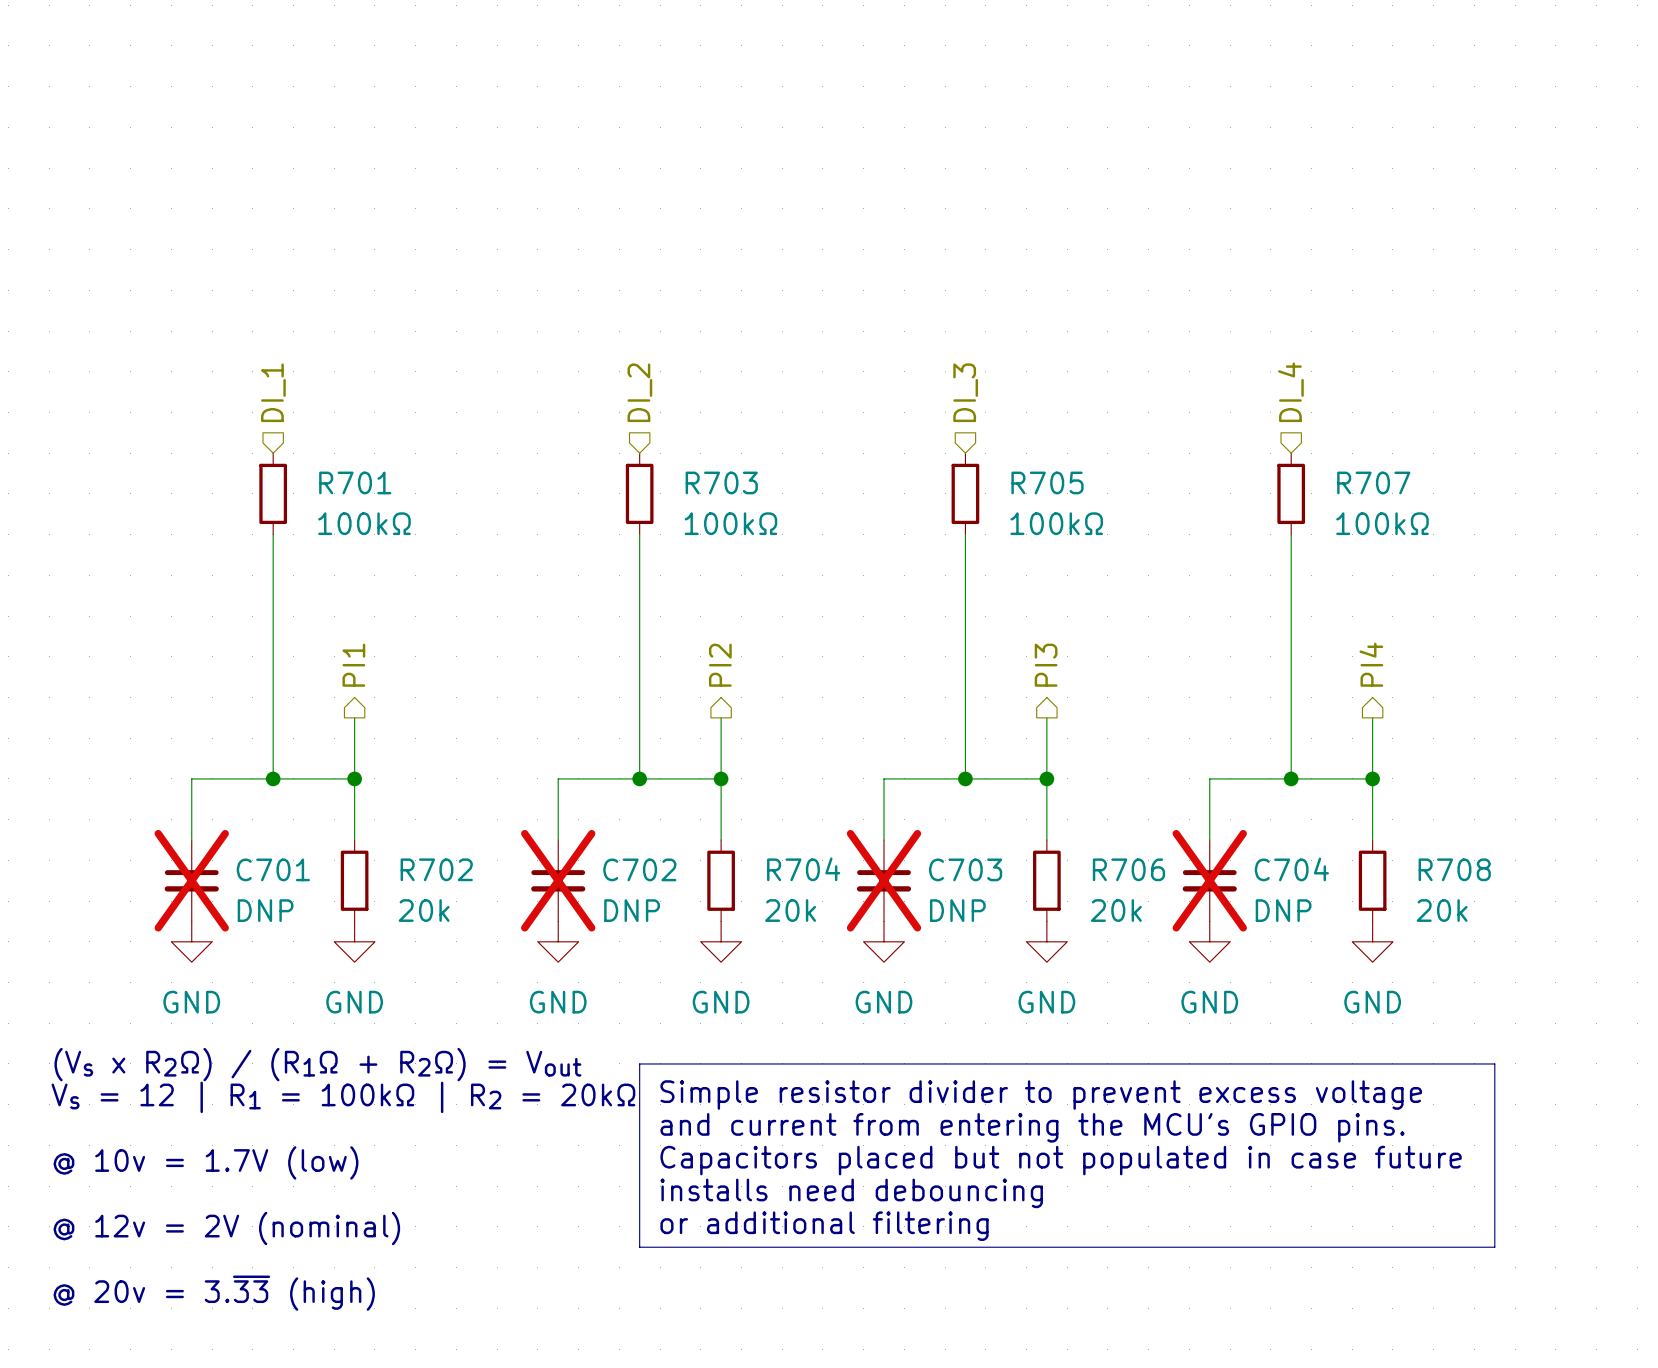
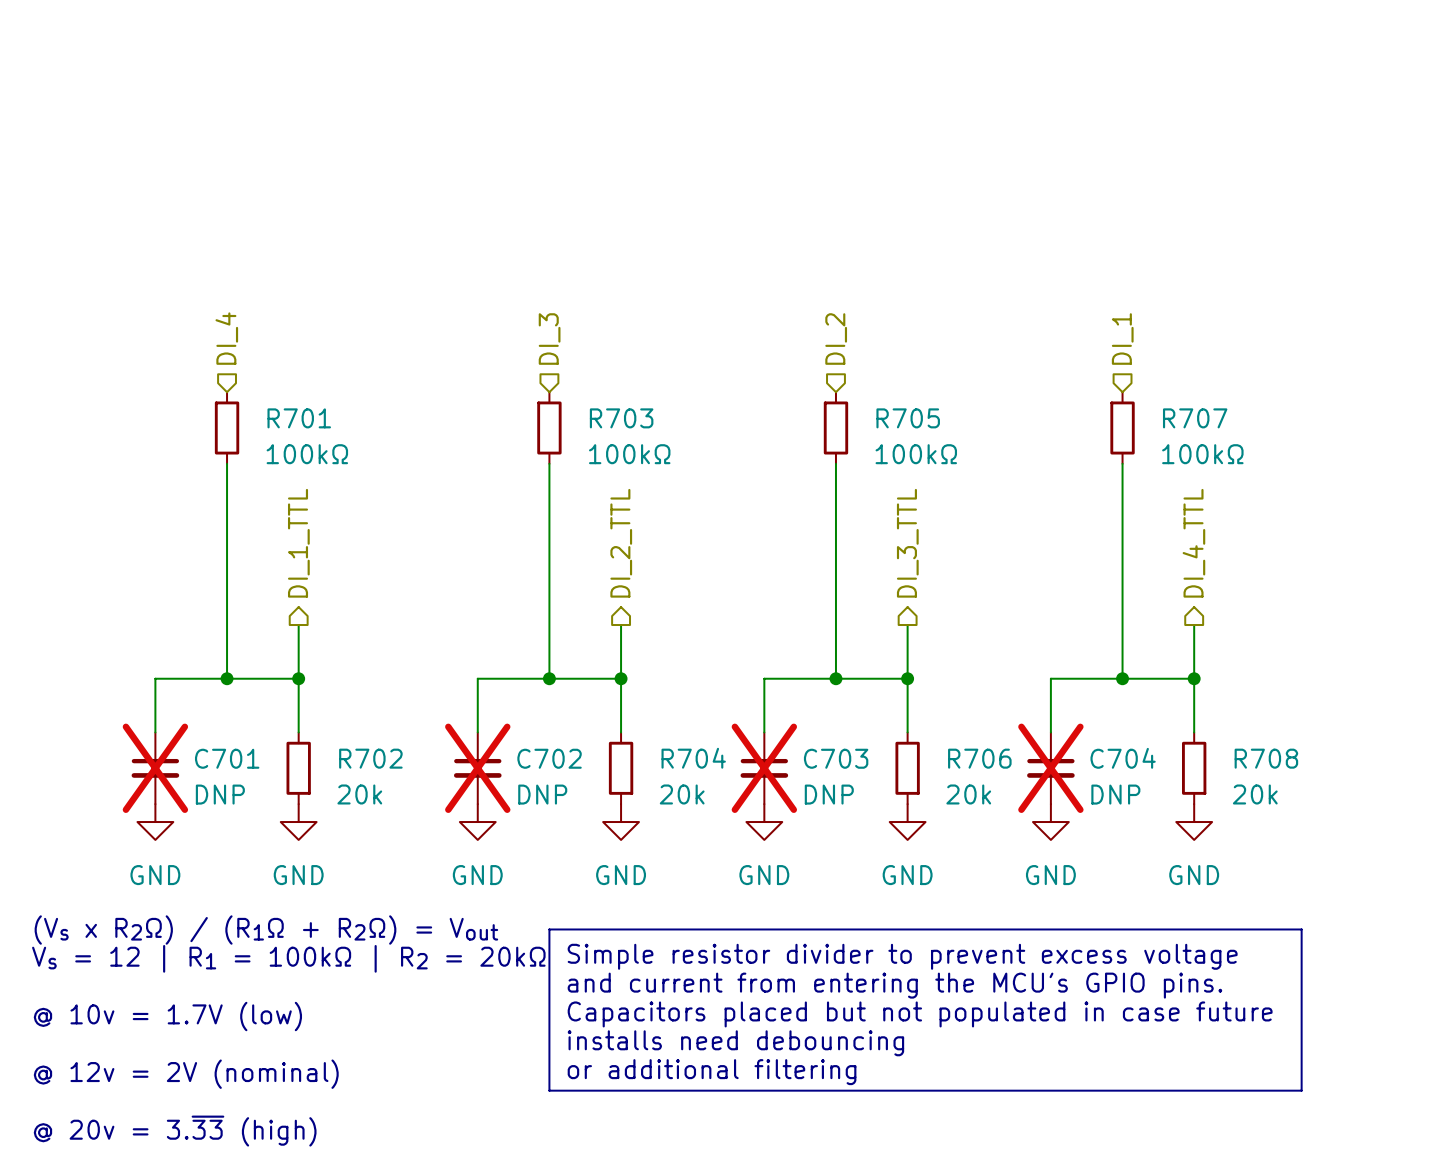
hierarchical label: DI_1 (273, 392) -> DI_4 (226, 338)
hierarchical label: DI_2 (639, 392) -> DI_3 (549, 339)
hierarchical label: DI_3 (965, 392) -> DI_2 (836, 339)
hierarchical label: DI_4 (1290, 392) -> DI_1 (1122, 339)
hierarchical label: PI4 (1371, 664) -> DI_4_TTL (1193, 543)
hierarchical label: PI1 (353, 665) -> DI_1_TTL (298, 543)
hierarchical label: PI2 (720, 665) -> DI_2_TTL (621, 543)
hierarchical label: PI3 (1046, 665) -> DI_3_TTL (907, 543)

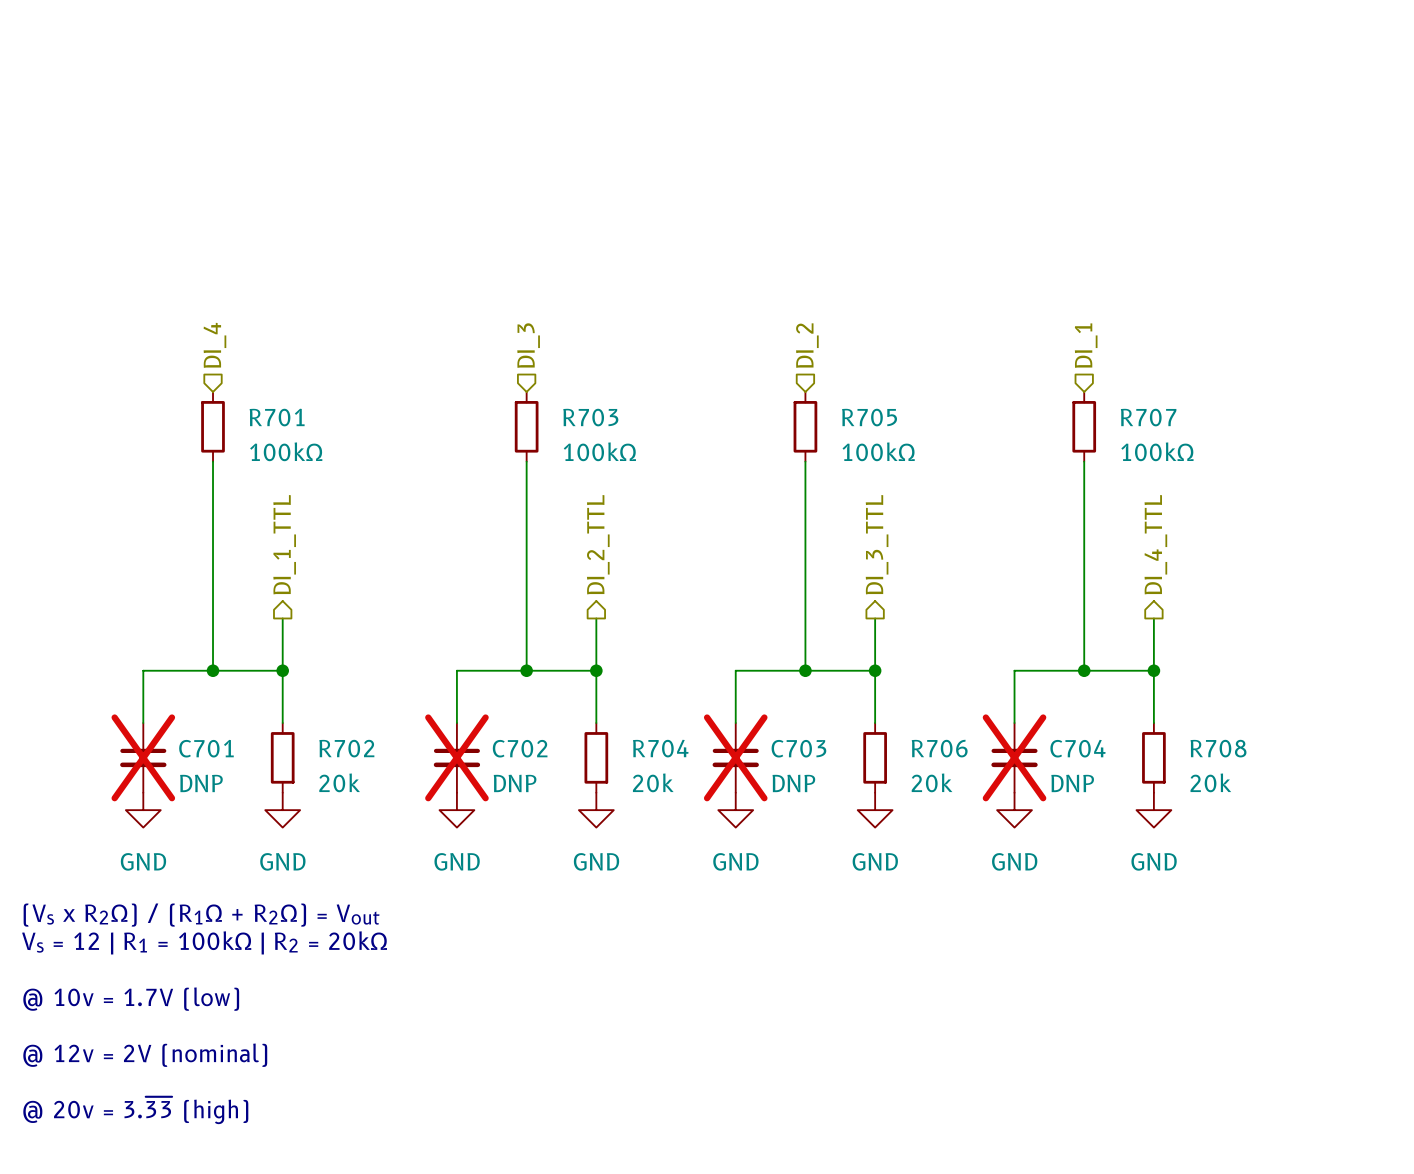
line: (549, 929) (1301, 929) (1301, 1090) (549, 1090) (549, 929) -> none
text: Simple resistor divider to prevent excess voltage (902, 956) -> none
text: and current from entering the MCU's GPIO pins. (894, 985) -> none
text: Capacitors placed but not populated in case future (920, 1014) -> none
text: installs need debouncing (735, 1043) -> none
text: or additional filtering (712, 1072) -> none

